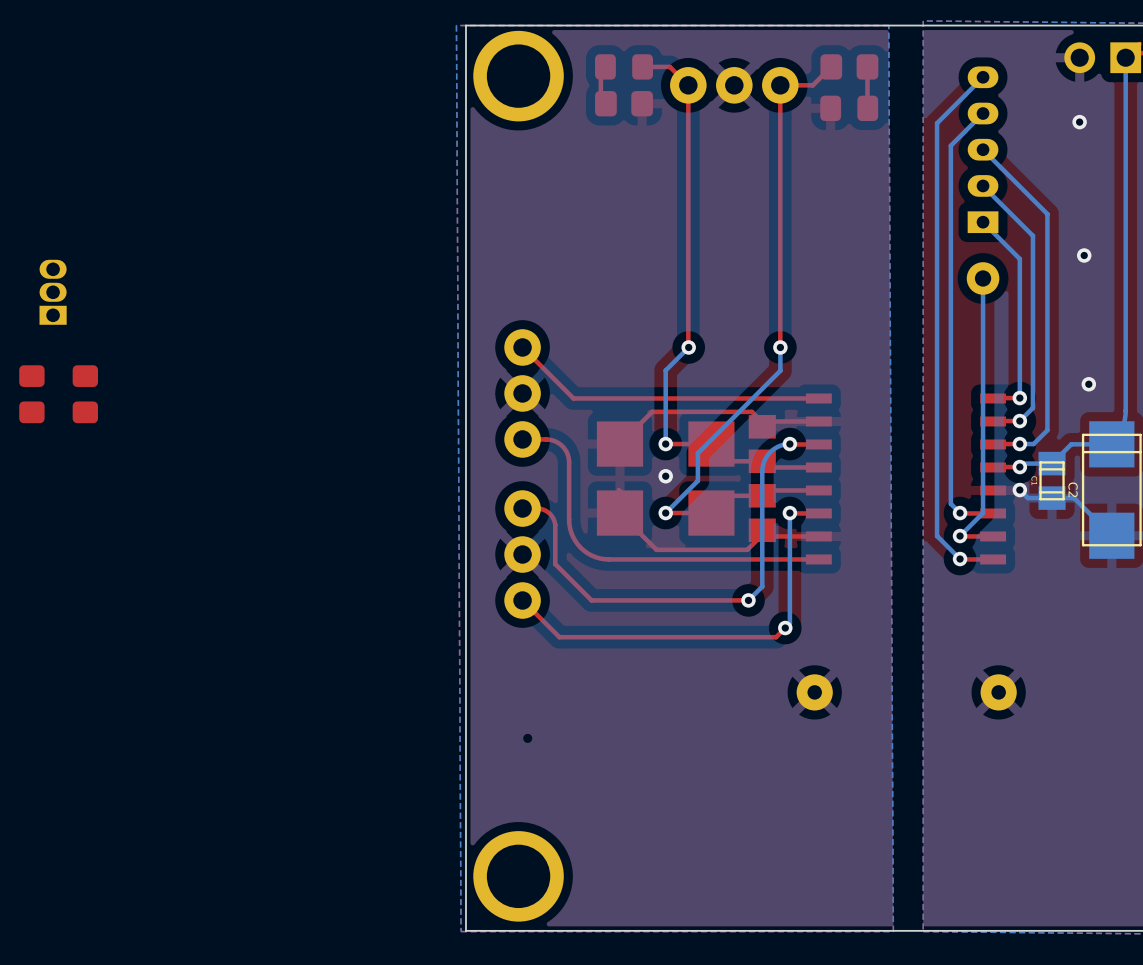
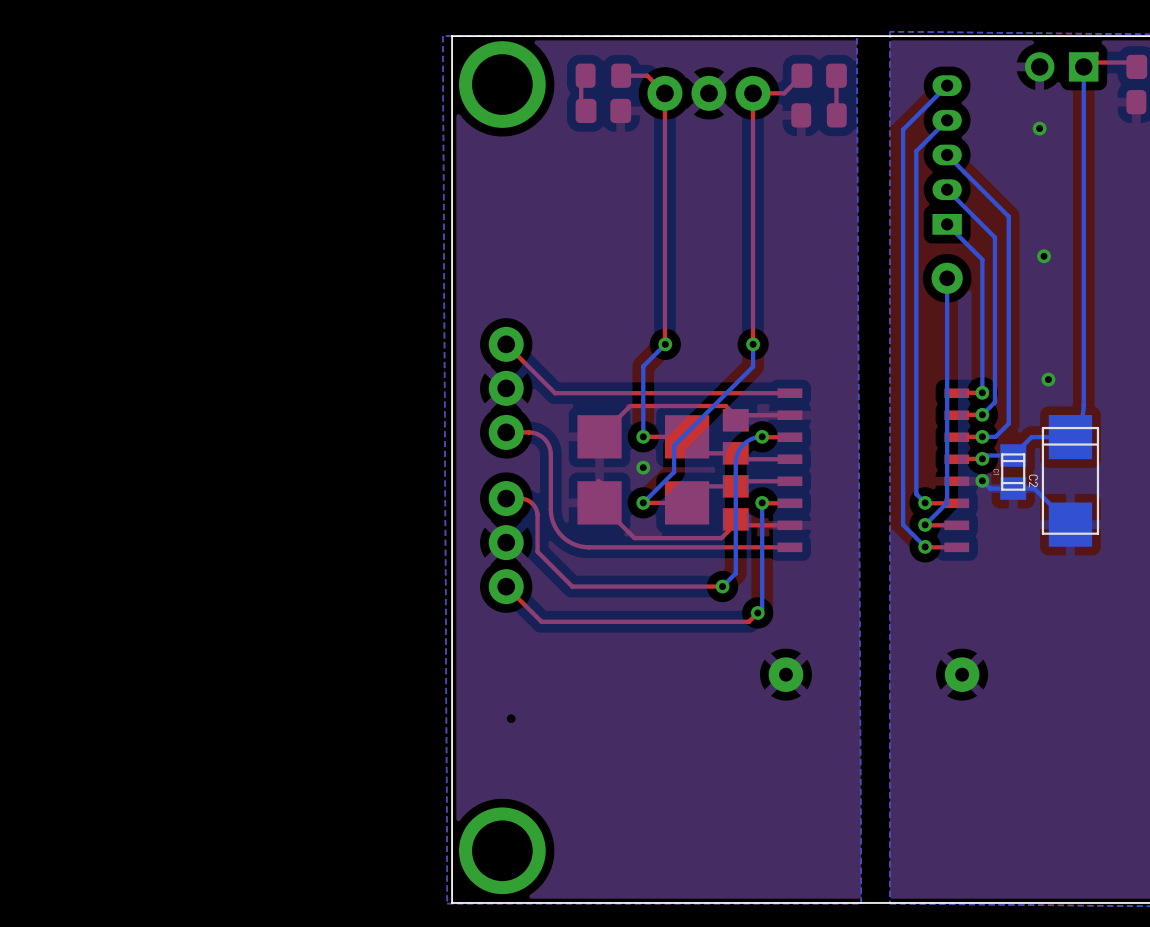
part: (53, 292) -> none
part: (31, 394) -> none
part: (85, 394) -> none

